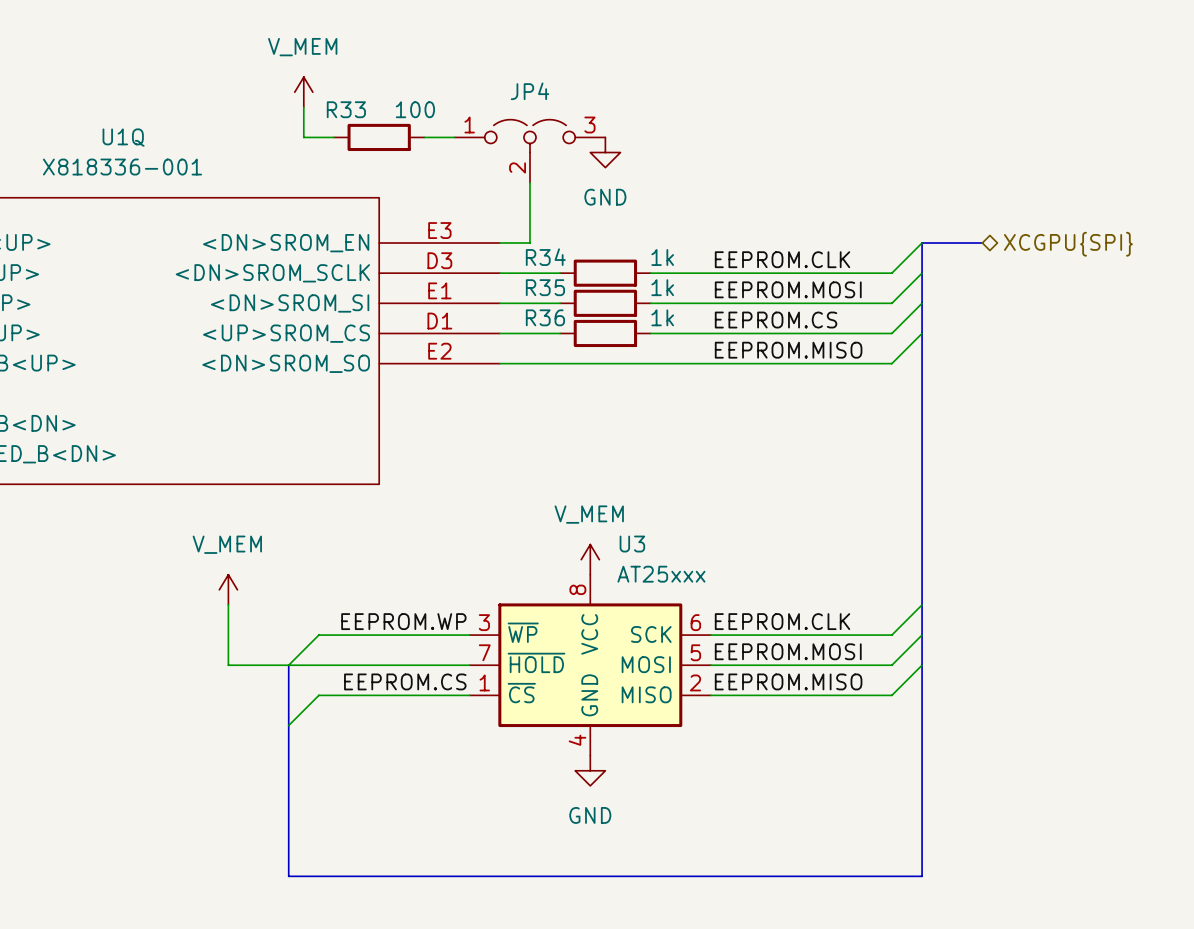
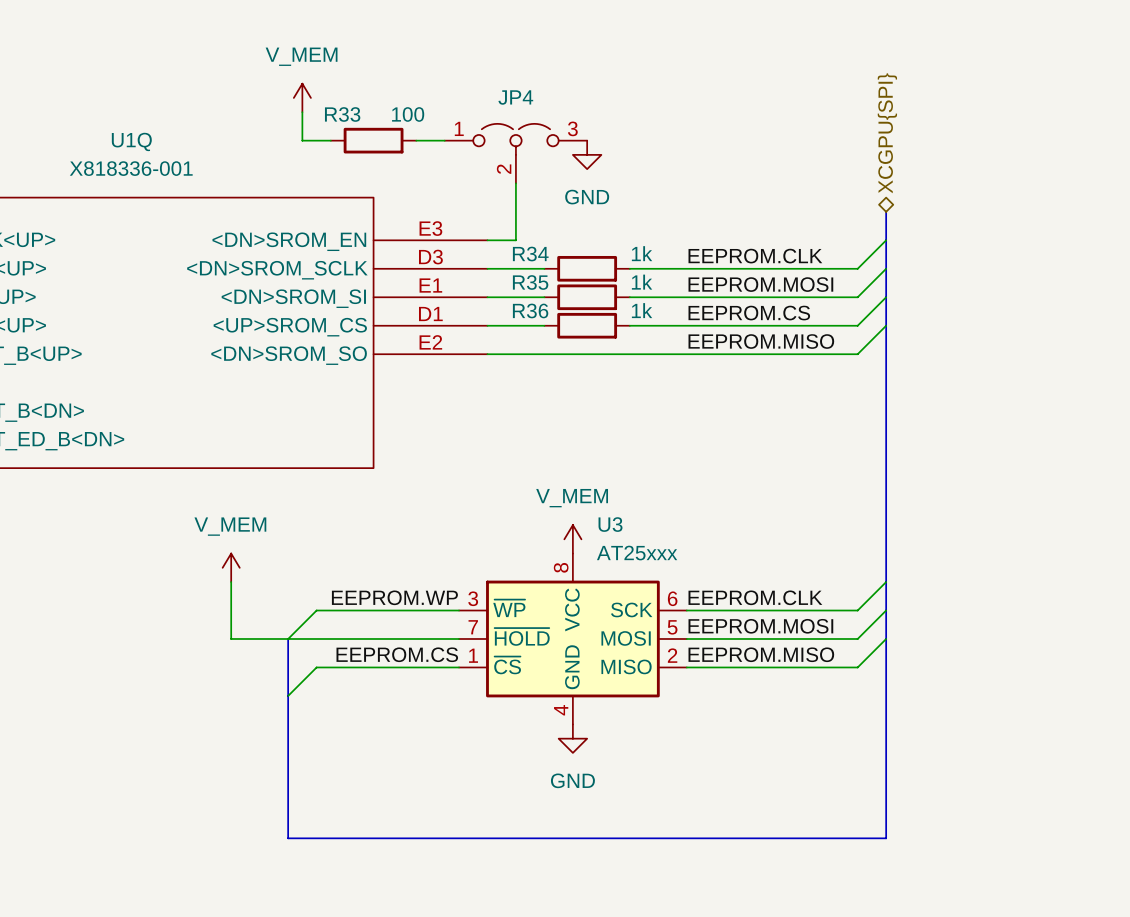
bus: (922, 243) (982, 243) -> (886, 240) (886, 211)
hierarchical label rotation: 0° (1068, 244) -> 90° counterclockwise (887, 133)
hierarchical label position: XCGPU{SPI} (1068, 244) -> XCGPU{SPI} (887, 133)

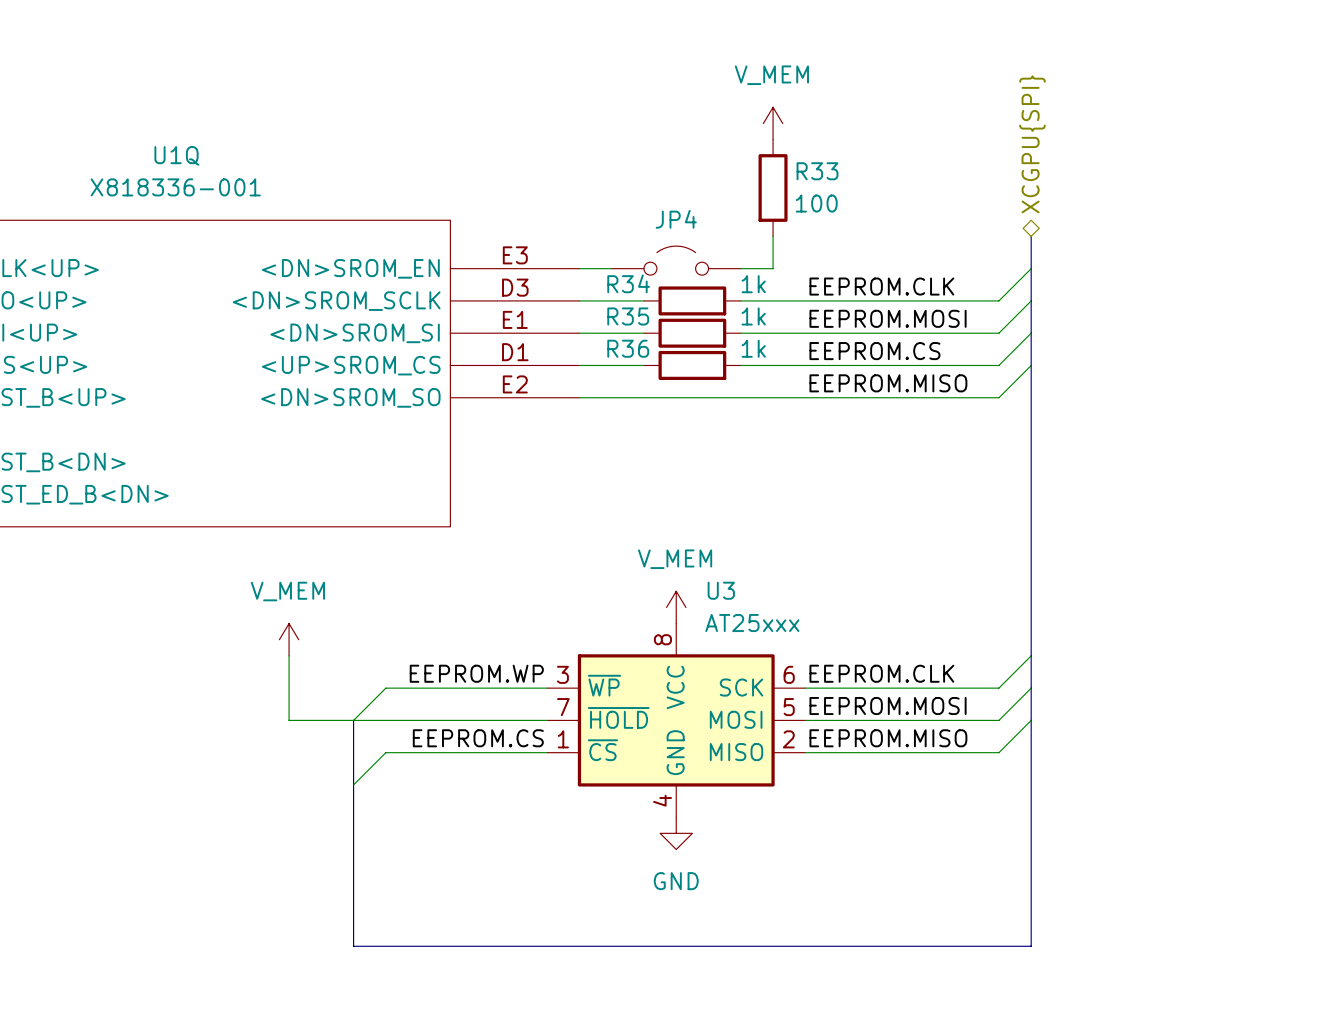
power symbol: V_MEM (302, 97) -> none
wire: (302, 112) (302, 140) (330, 140) -> none
power symbol: none -> V_MEM (773, 123)
R33 name position: R33 (342, 114) -> R33 (817, 171)
R33 value position: 100 (408, 114) -> 100 (816, 203)
JP4 symbol: [444, 123, 588, 184] -> [611, 246, 741, 276]
R33 rotation: 0° (373, 140) -> 90° clockwise (773, 188)
R33 position: (373, 140) -> (773, 188)
wire: (416, 140) (444, 140) -> none
power symbol: GND (587, 154) -> none
wire: (515, 183) (515, 240) -> none
wire: none -> (773, 236) (773, 268) (740, 268)

